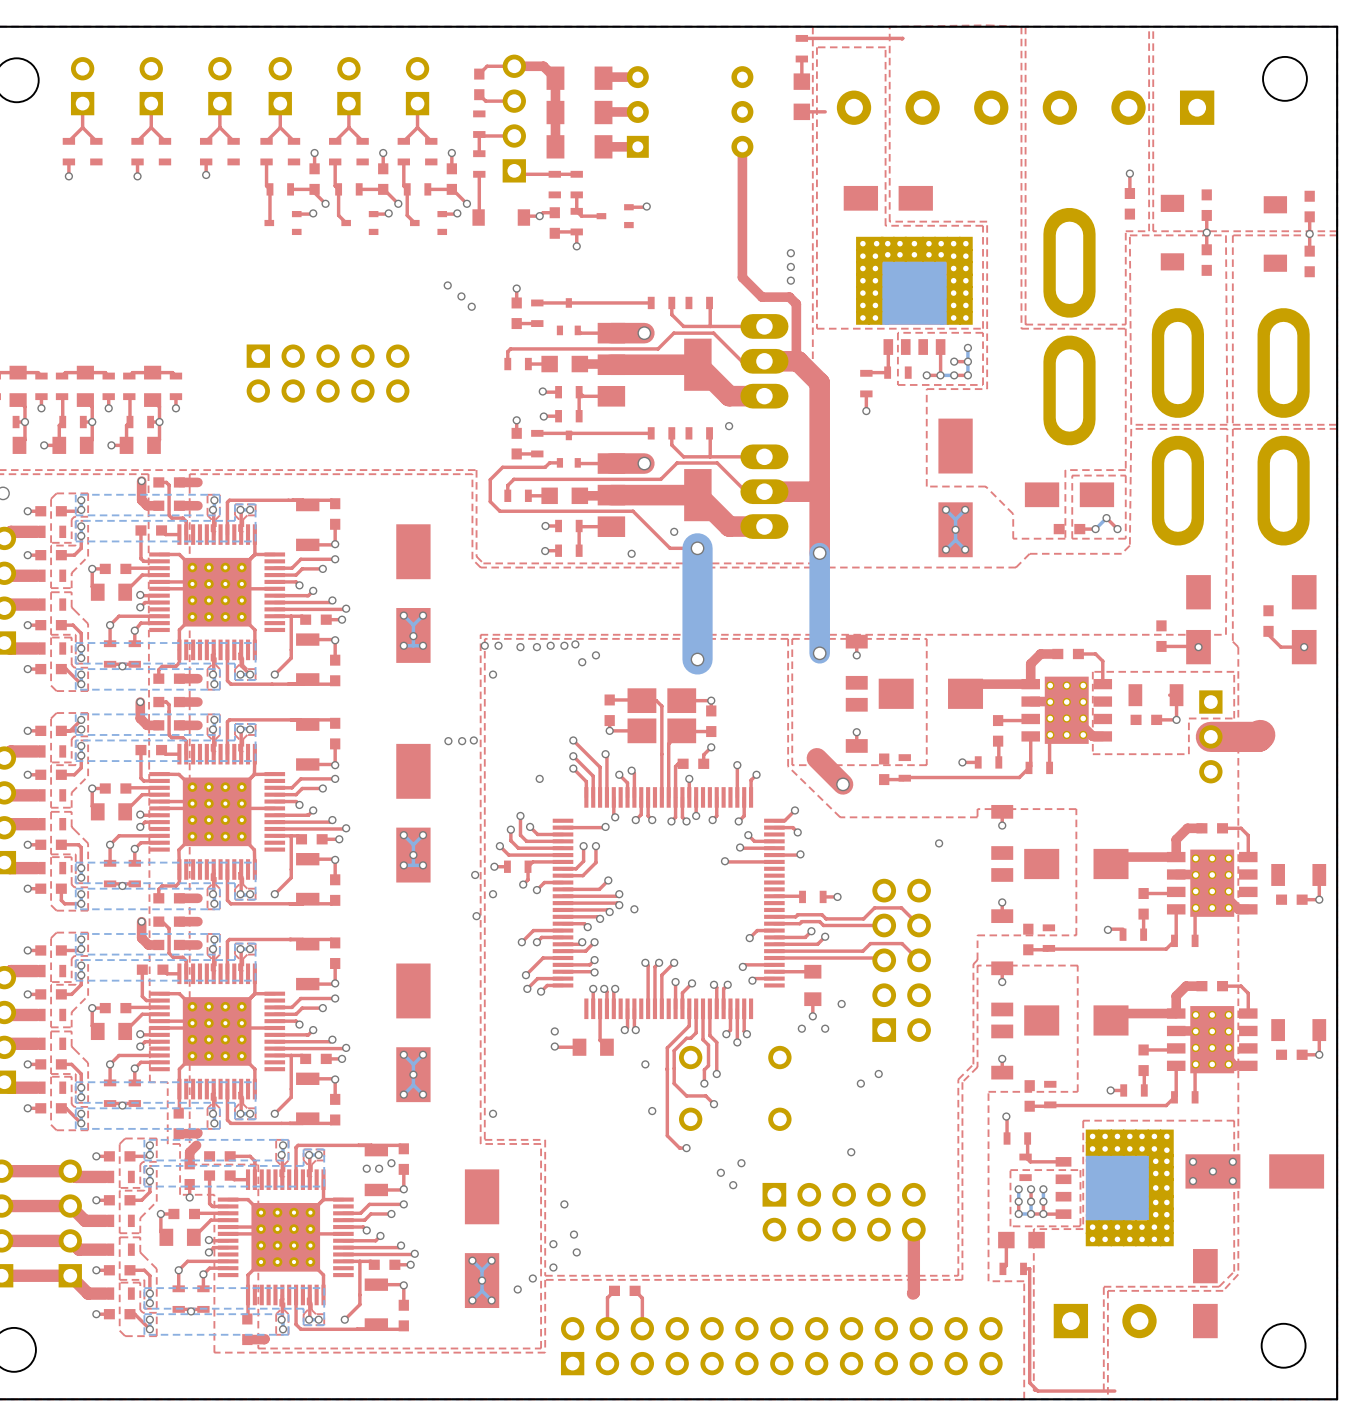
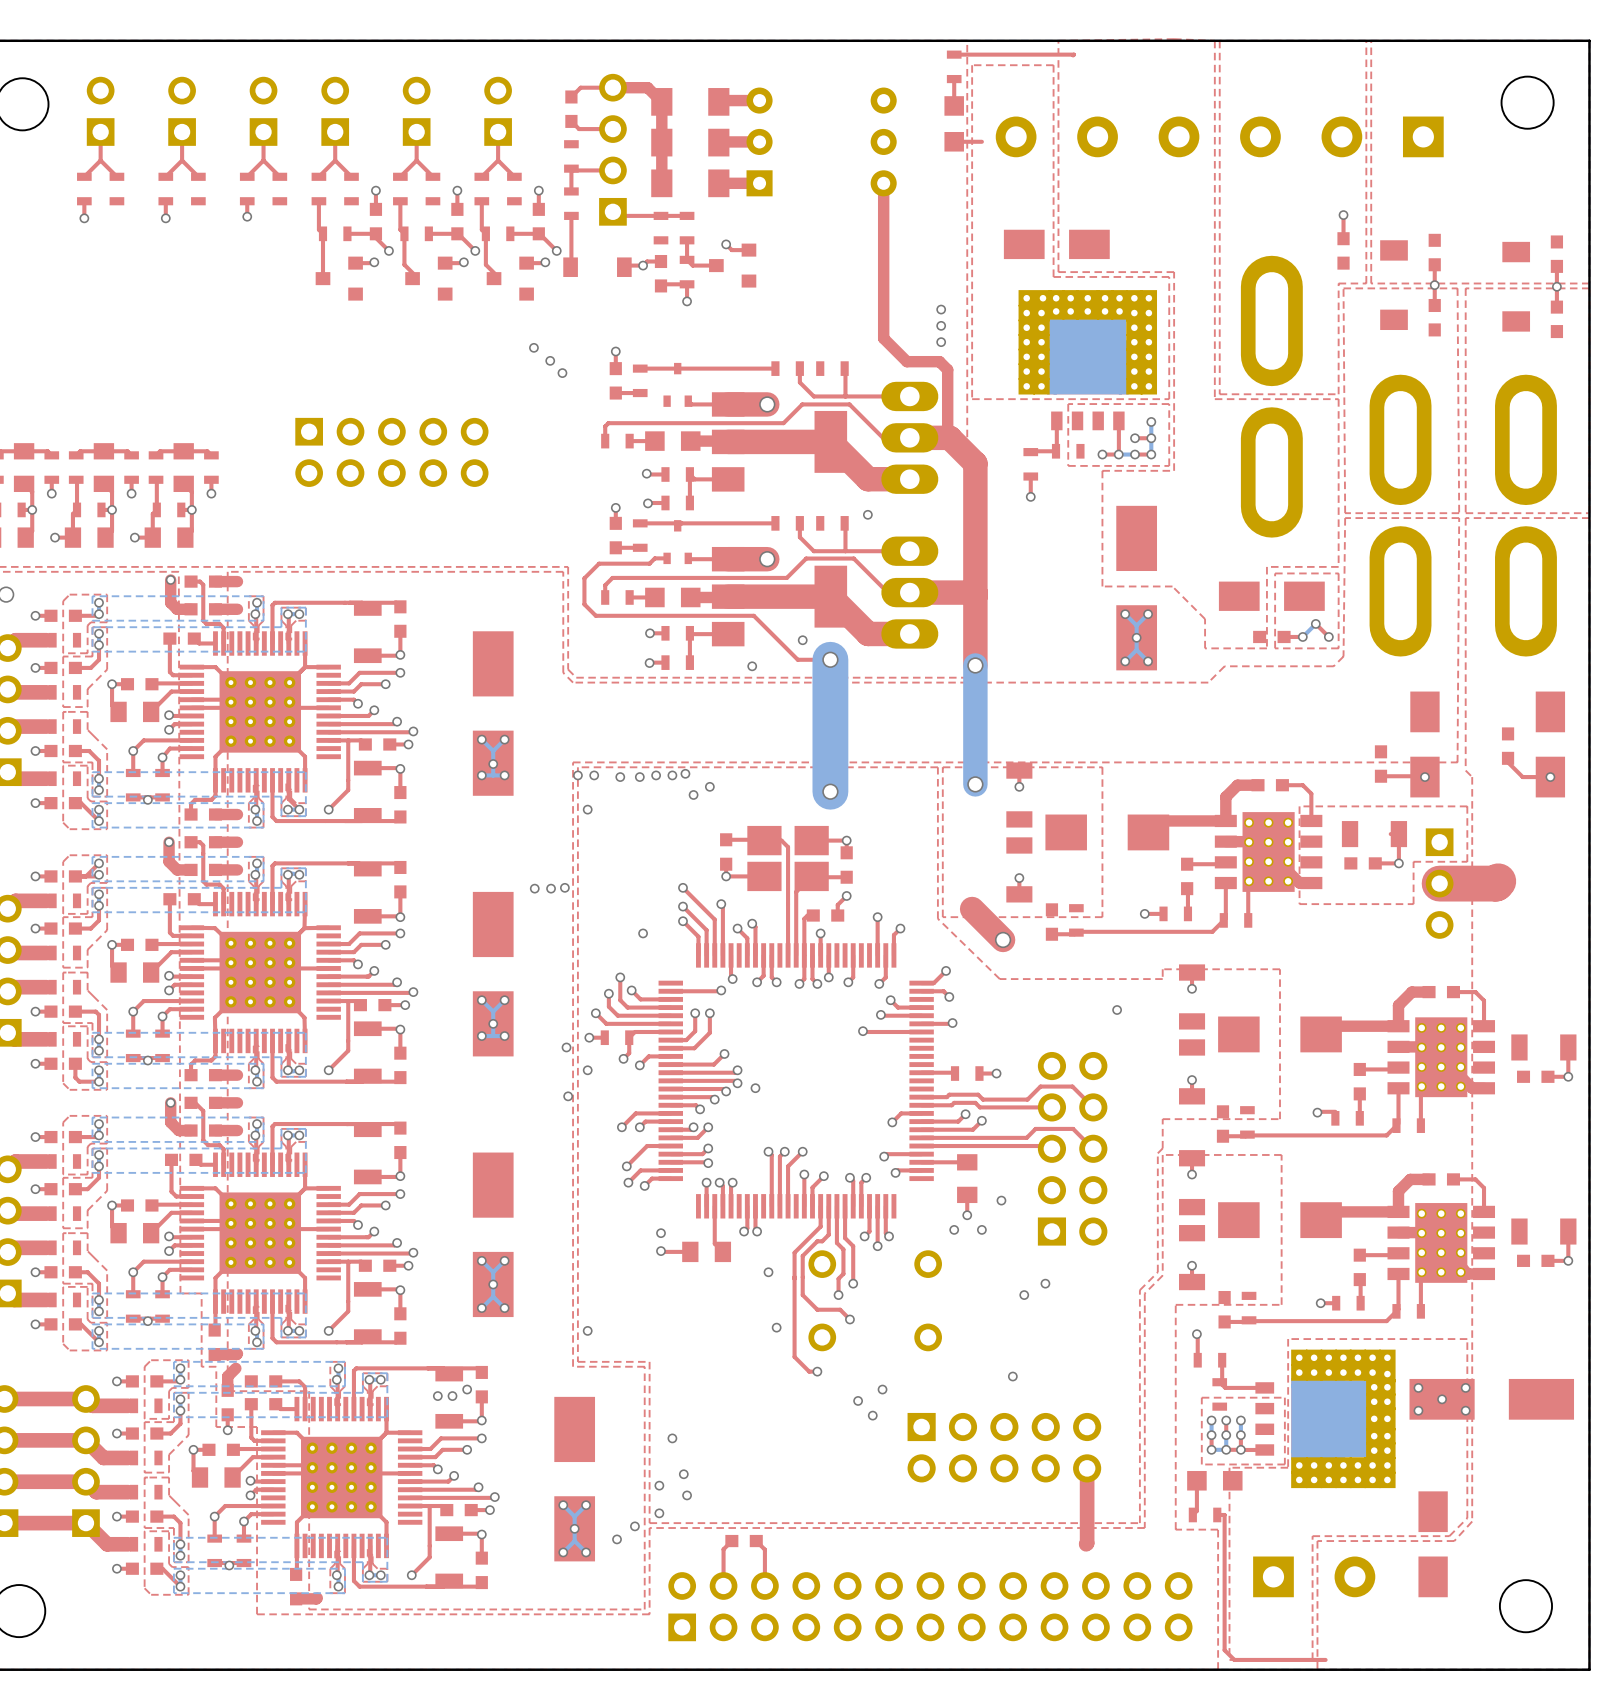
top track: none -> (726, 244) (731, 250) (748, 250)
part footprint: [596, 204, 634, 229] -> [709, 243, 757, 288]
top track: (646, 206) (628, 207) -> none
via position: (646, 206) -> (726, 244)
part footprint: [264, 211, 302, 236] -> [315, 256, 363, 301]
part footprint: [341, 211, 379, 236] -> [405, 256, 453, 301]
part footprint: [409, 211, 448, 236] -> [486, 256, 534, 301]

